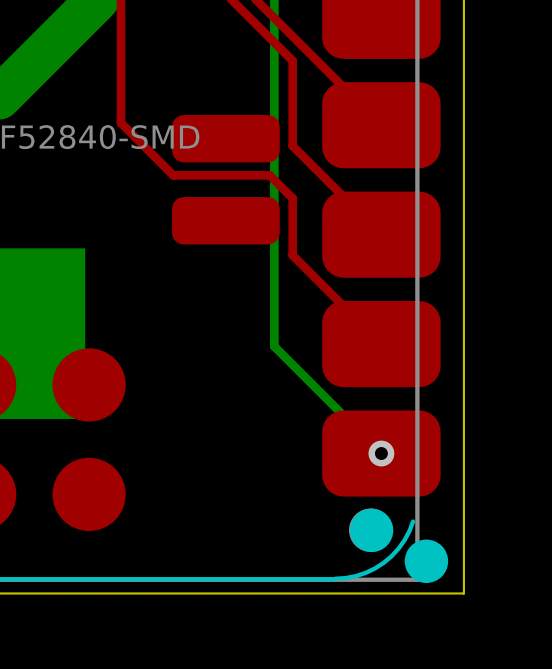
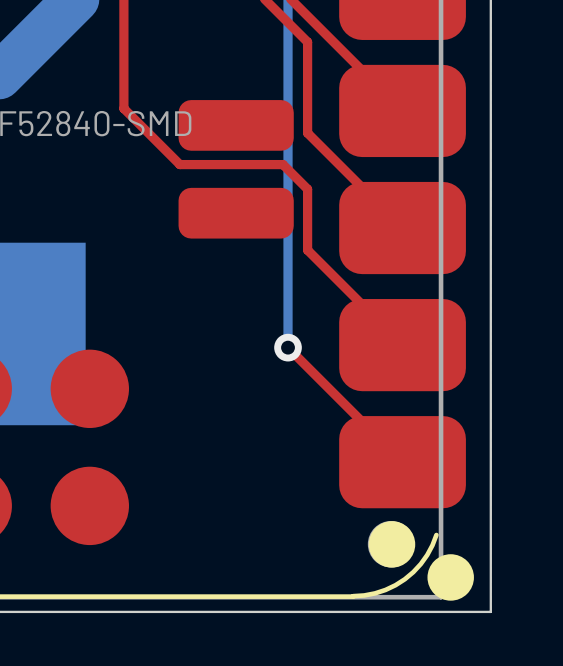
bottom track: (274, 346) (381, 453) -> none
top track: none -> (288, 347) (402, 462)
via position: (381, 453) -> (288, 347)

